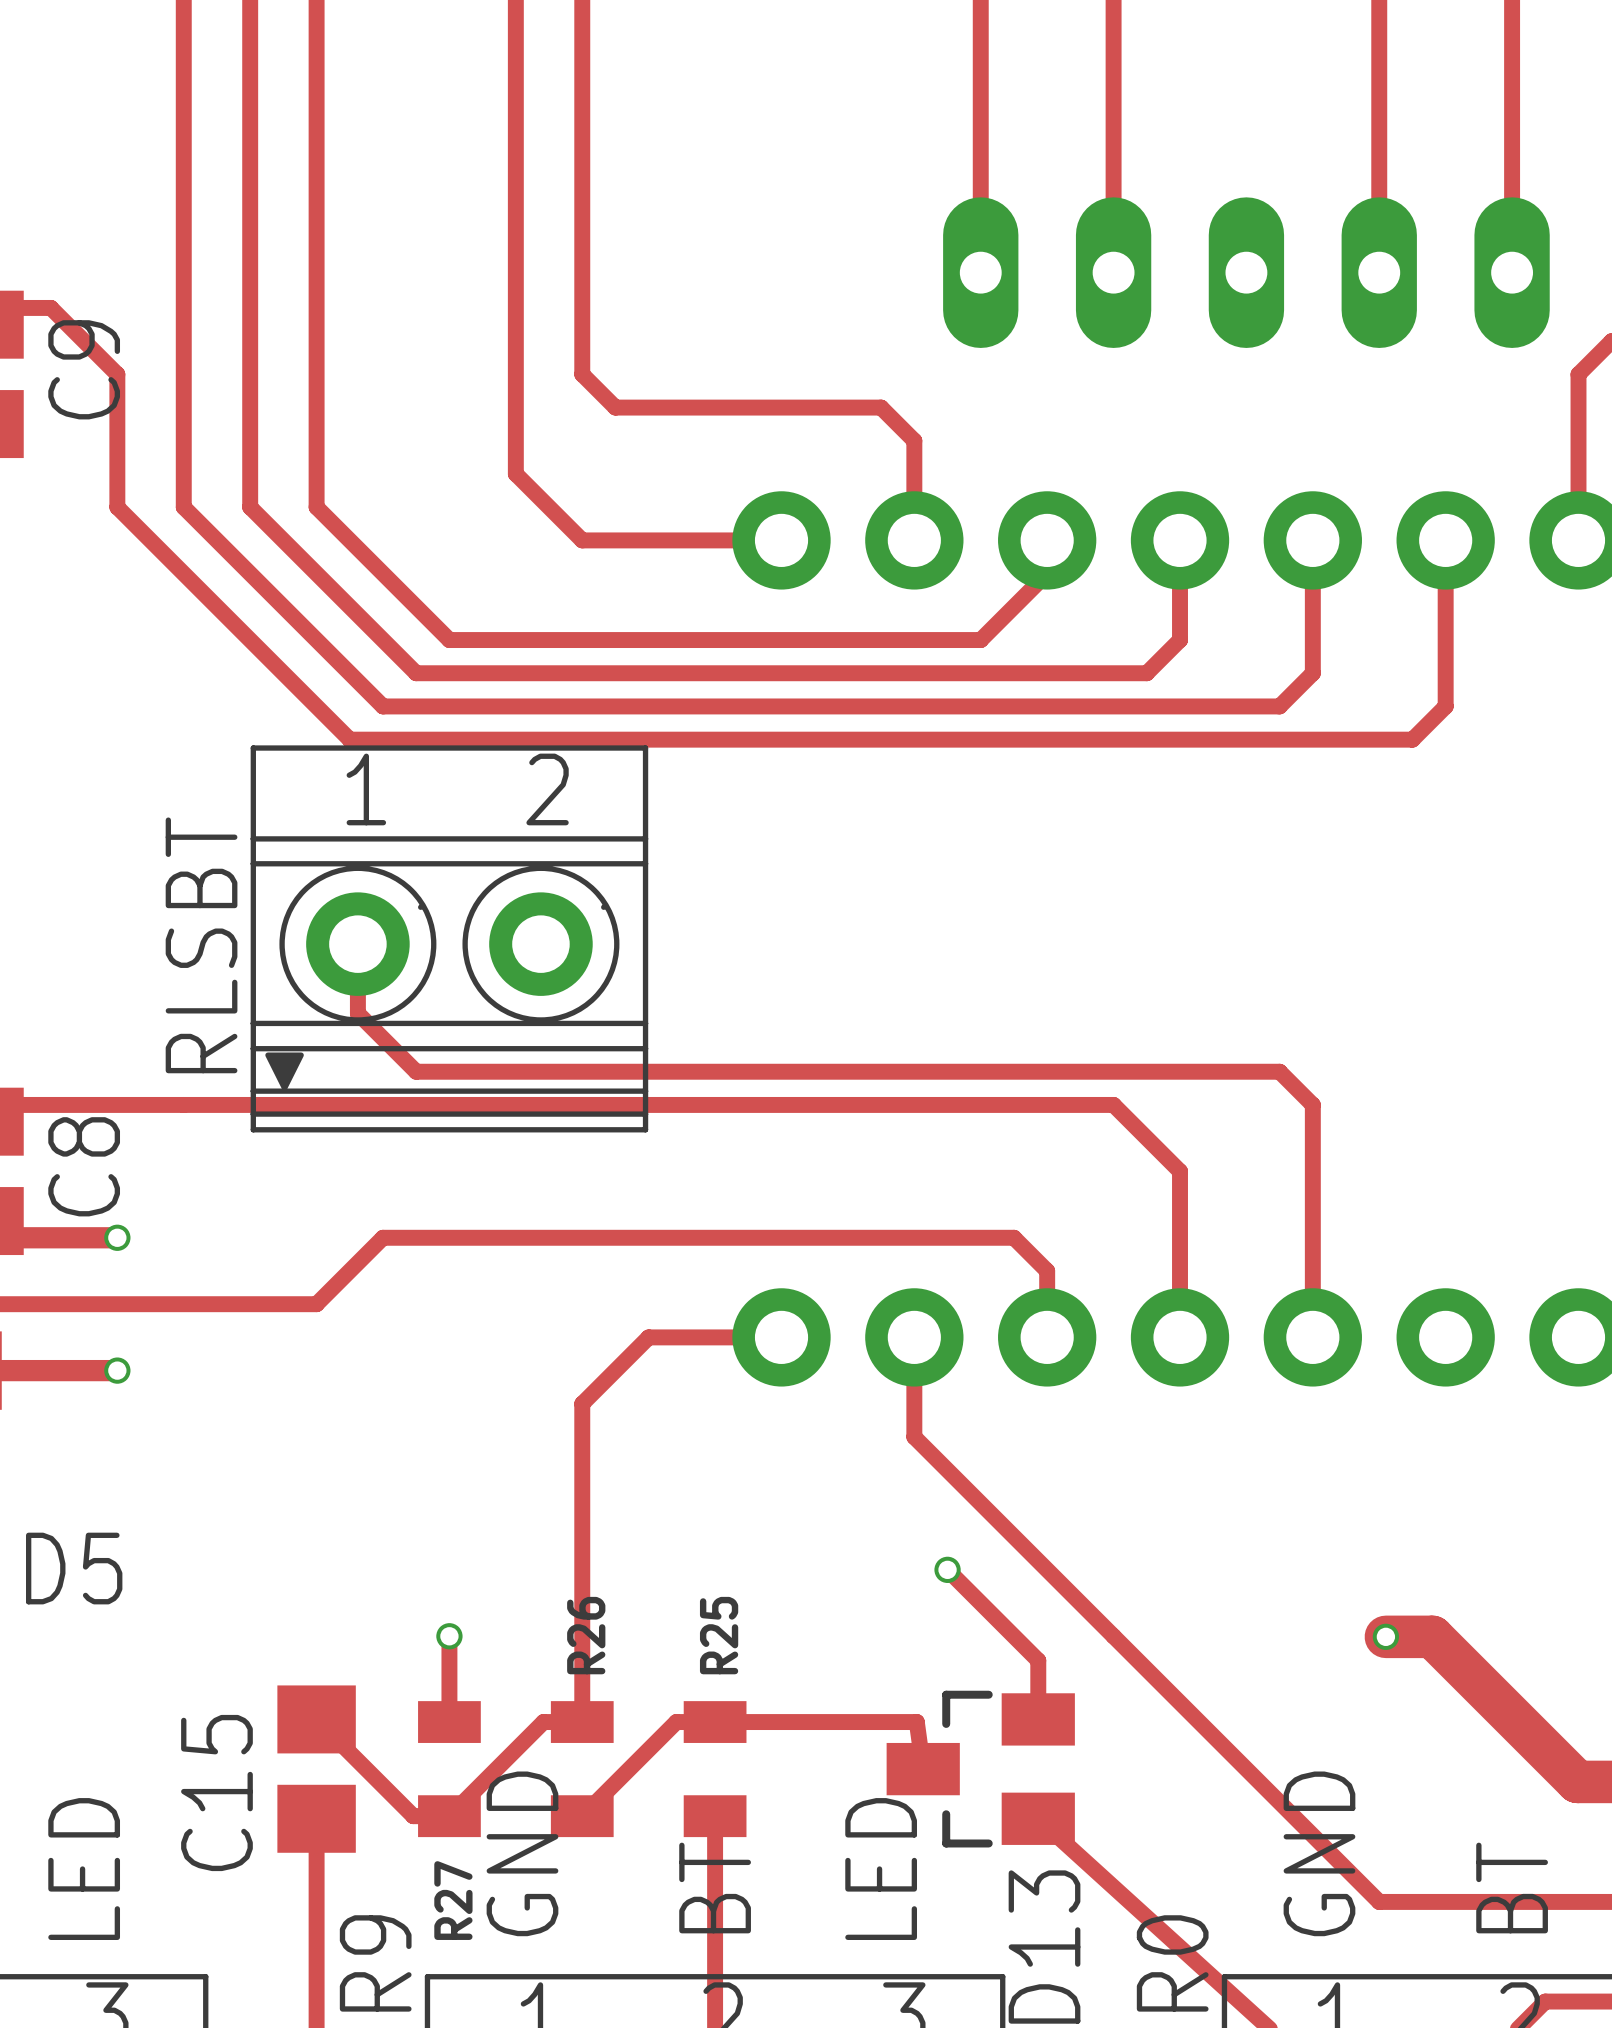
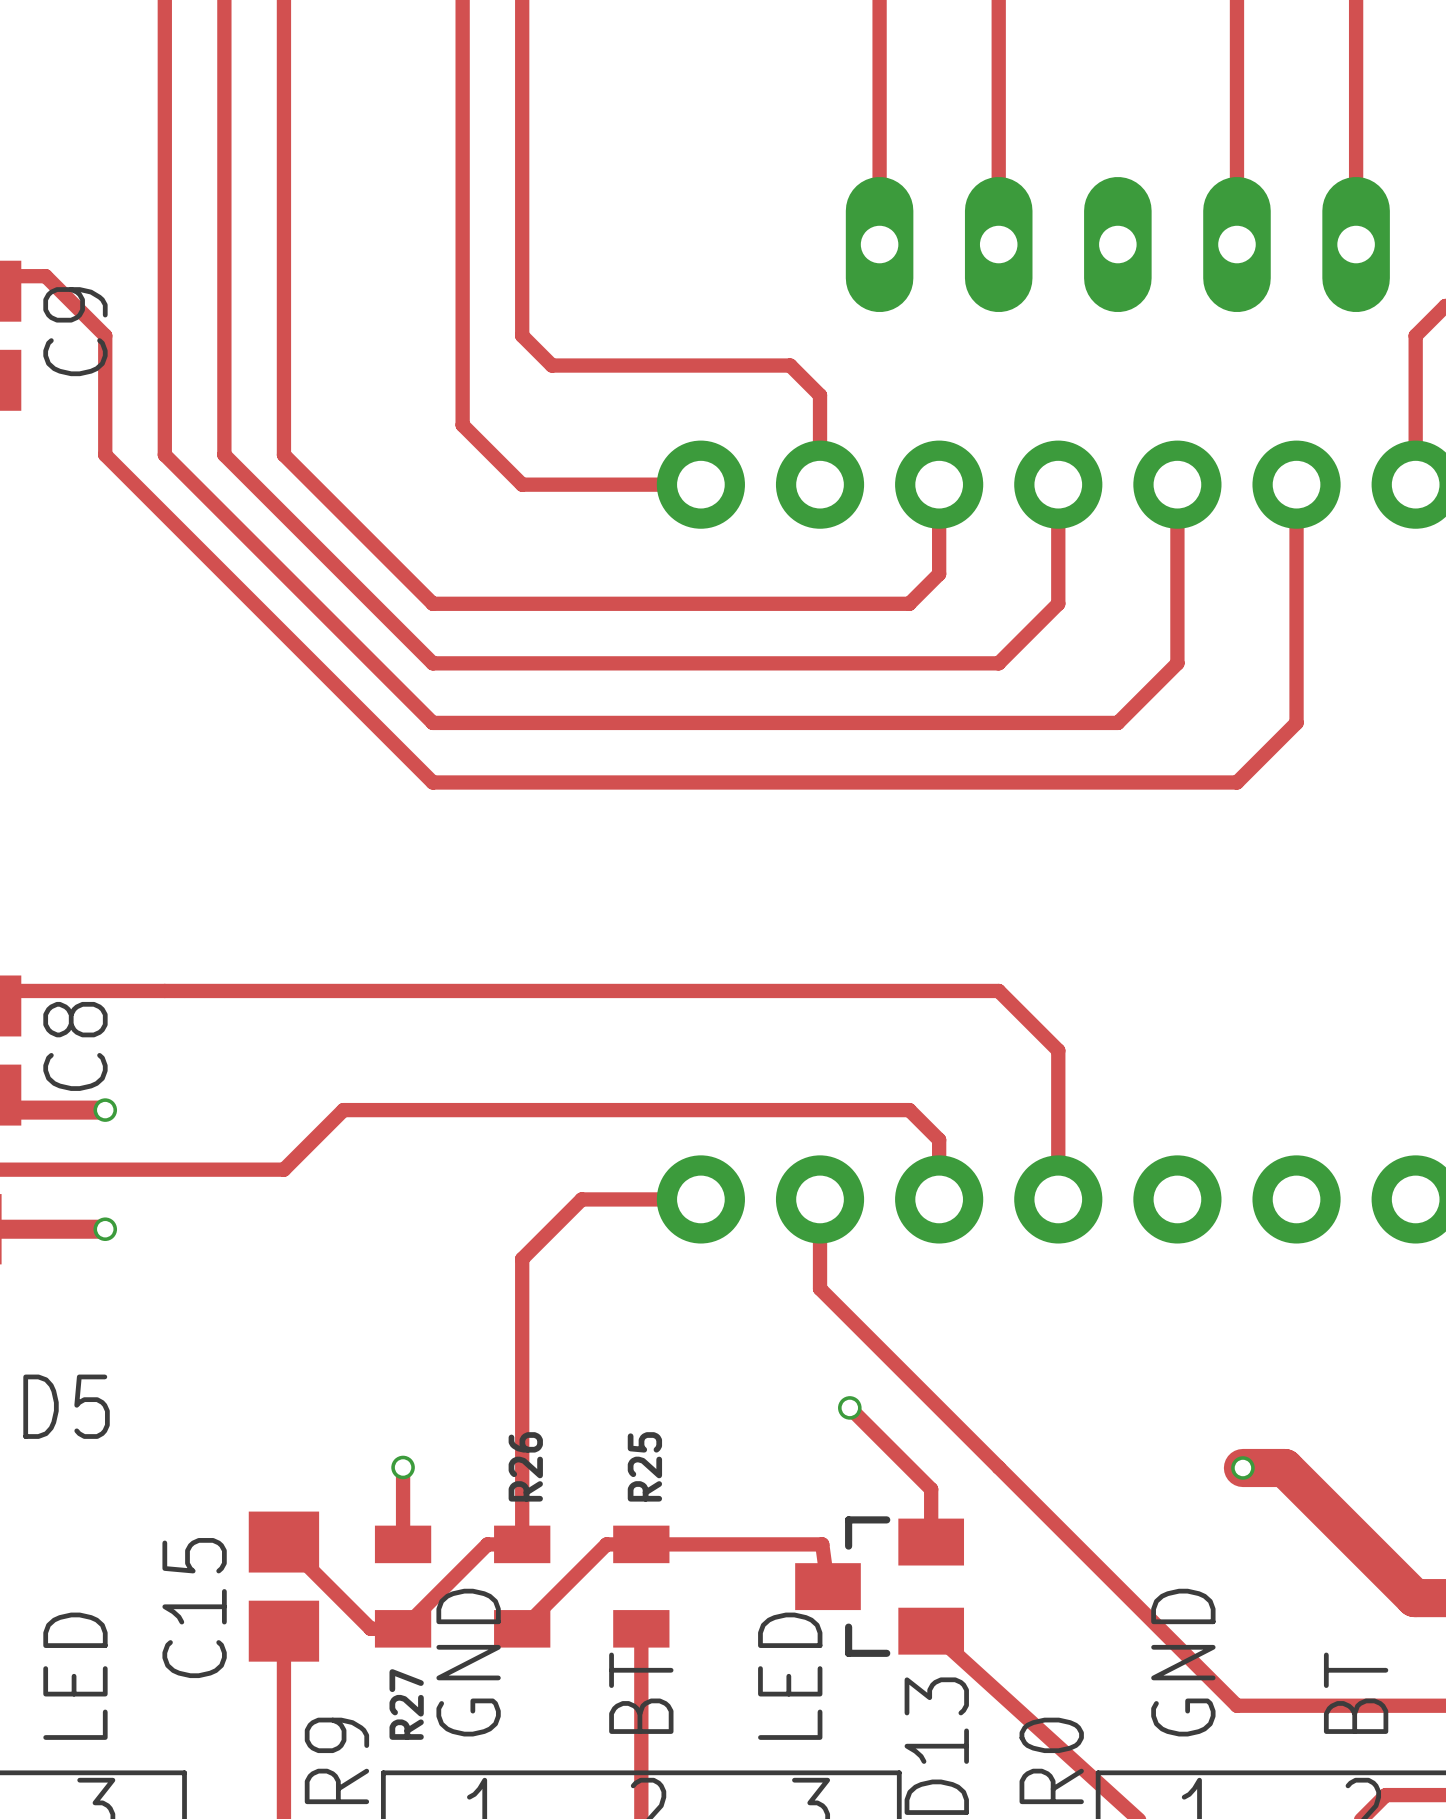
track: (1047, 573) (980, 640) (449, 640) -> (939, 514) (939, 574) (909, 603)
track: (1180, 640) (1146, 673) (1013, 673) -> (1058, 574) (1058, 603) (998, 663)
track: (416, 673) (482, 673) -> (403, 574) (432, 603)
track: (1312, 673) (1279, 706) (383, 706) -> (1177, 603) (1177, 663) (1117, 722) (432, 722) (343, 633)
track: (1445, 706) (1412, 739) (1113, 739) -> (1296, 633) (1296, 722) (1236, 782) (432, 782) (313, 663)
track: (349, 739) (482, 739) -> (373, 603) (432, 663)
RLSBT: (449, 938) -> none
track: (357, 944) (357, 1013) (416, 1071) (1279, 1071) (1312, 1104) (1312, 1337) -> none

